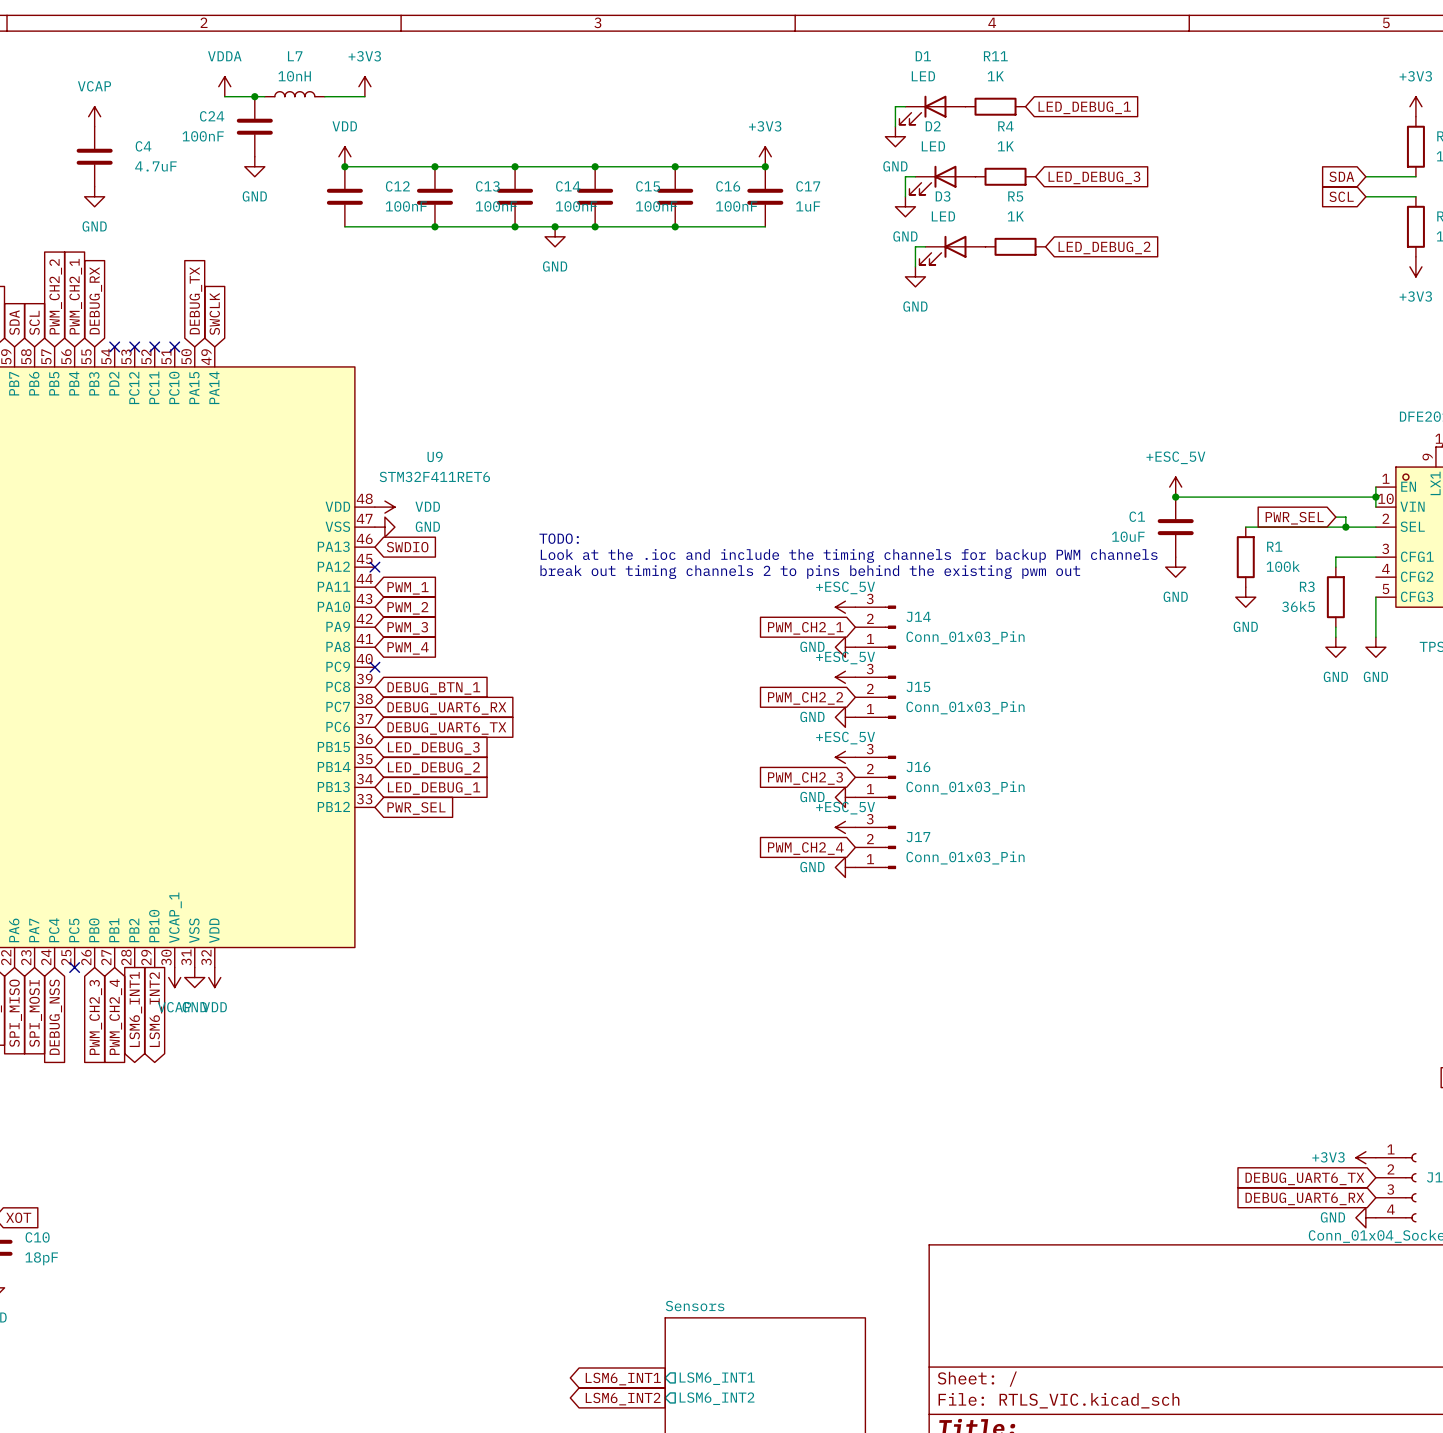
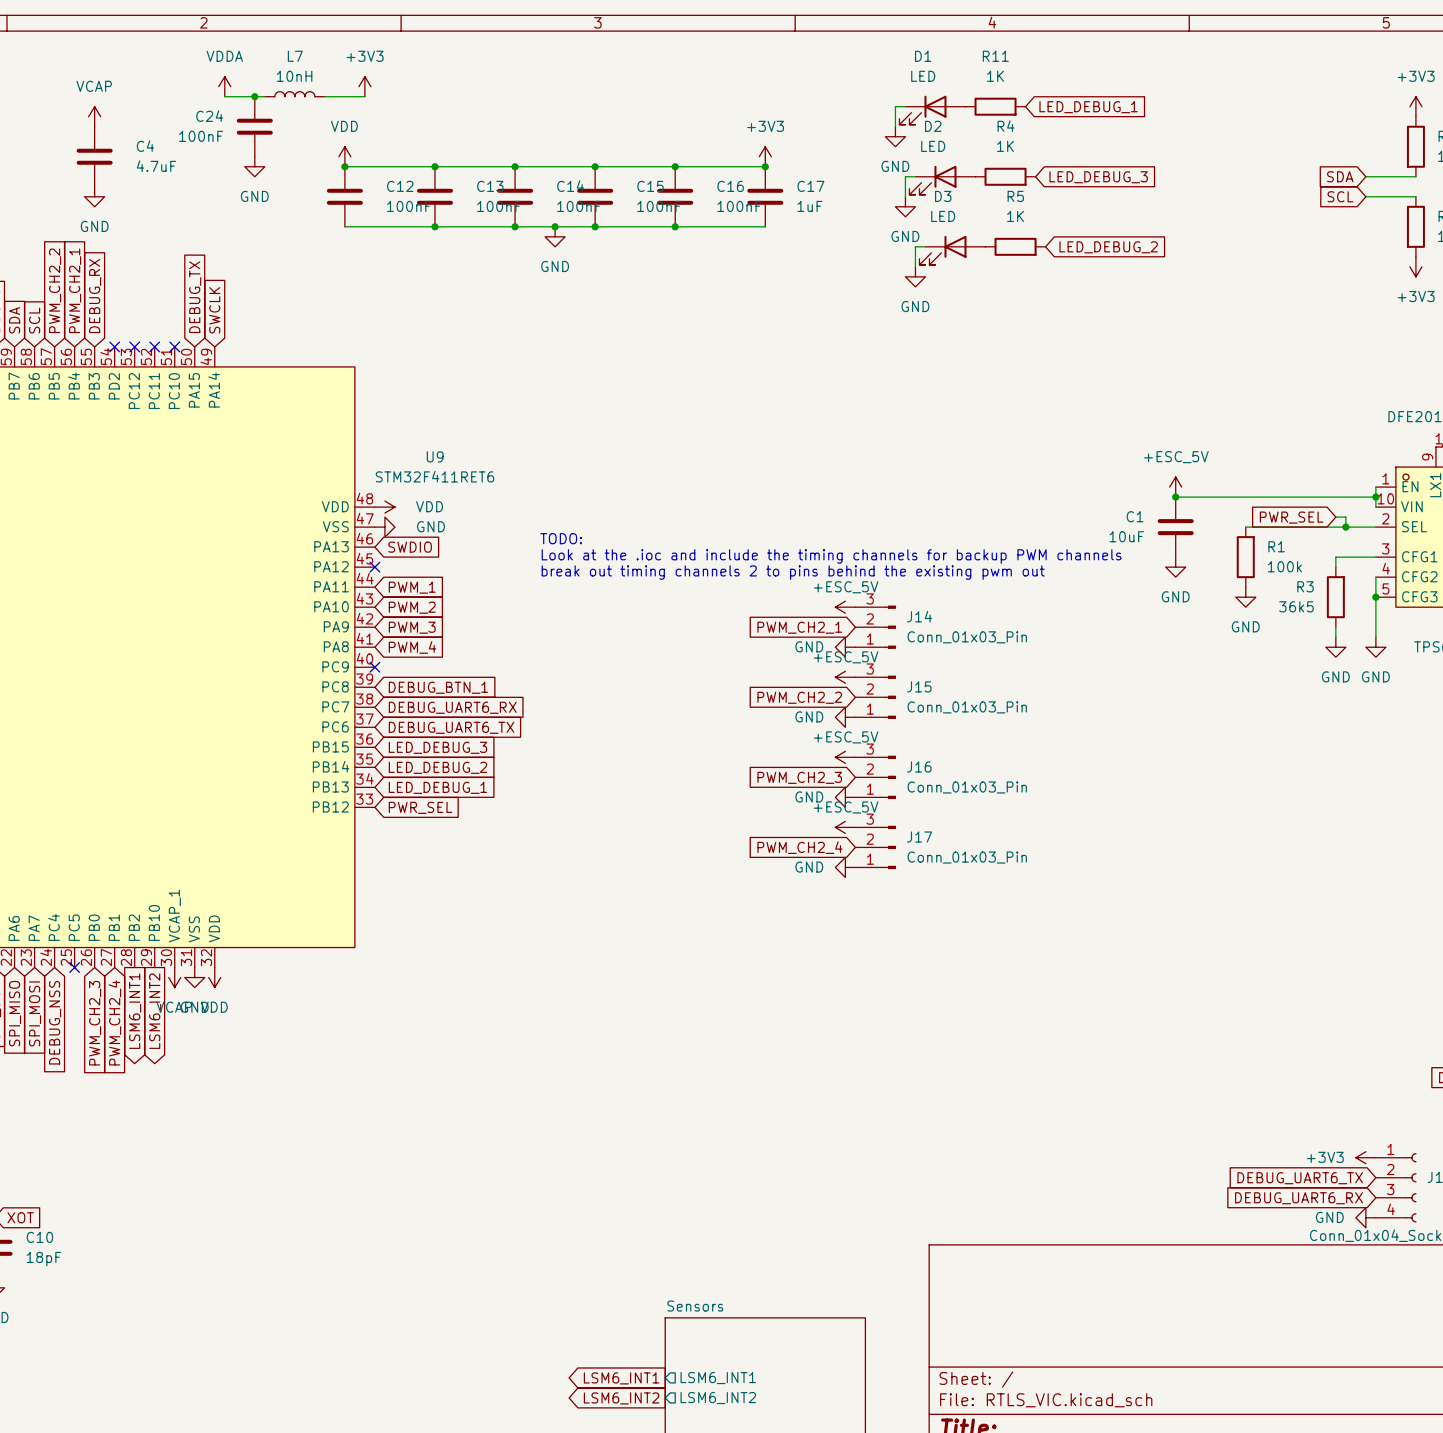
wire: none -> (1375, 577) (1375, 597)
junction: none -> (1375, 597)

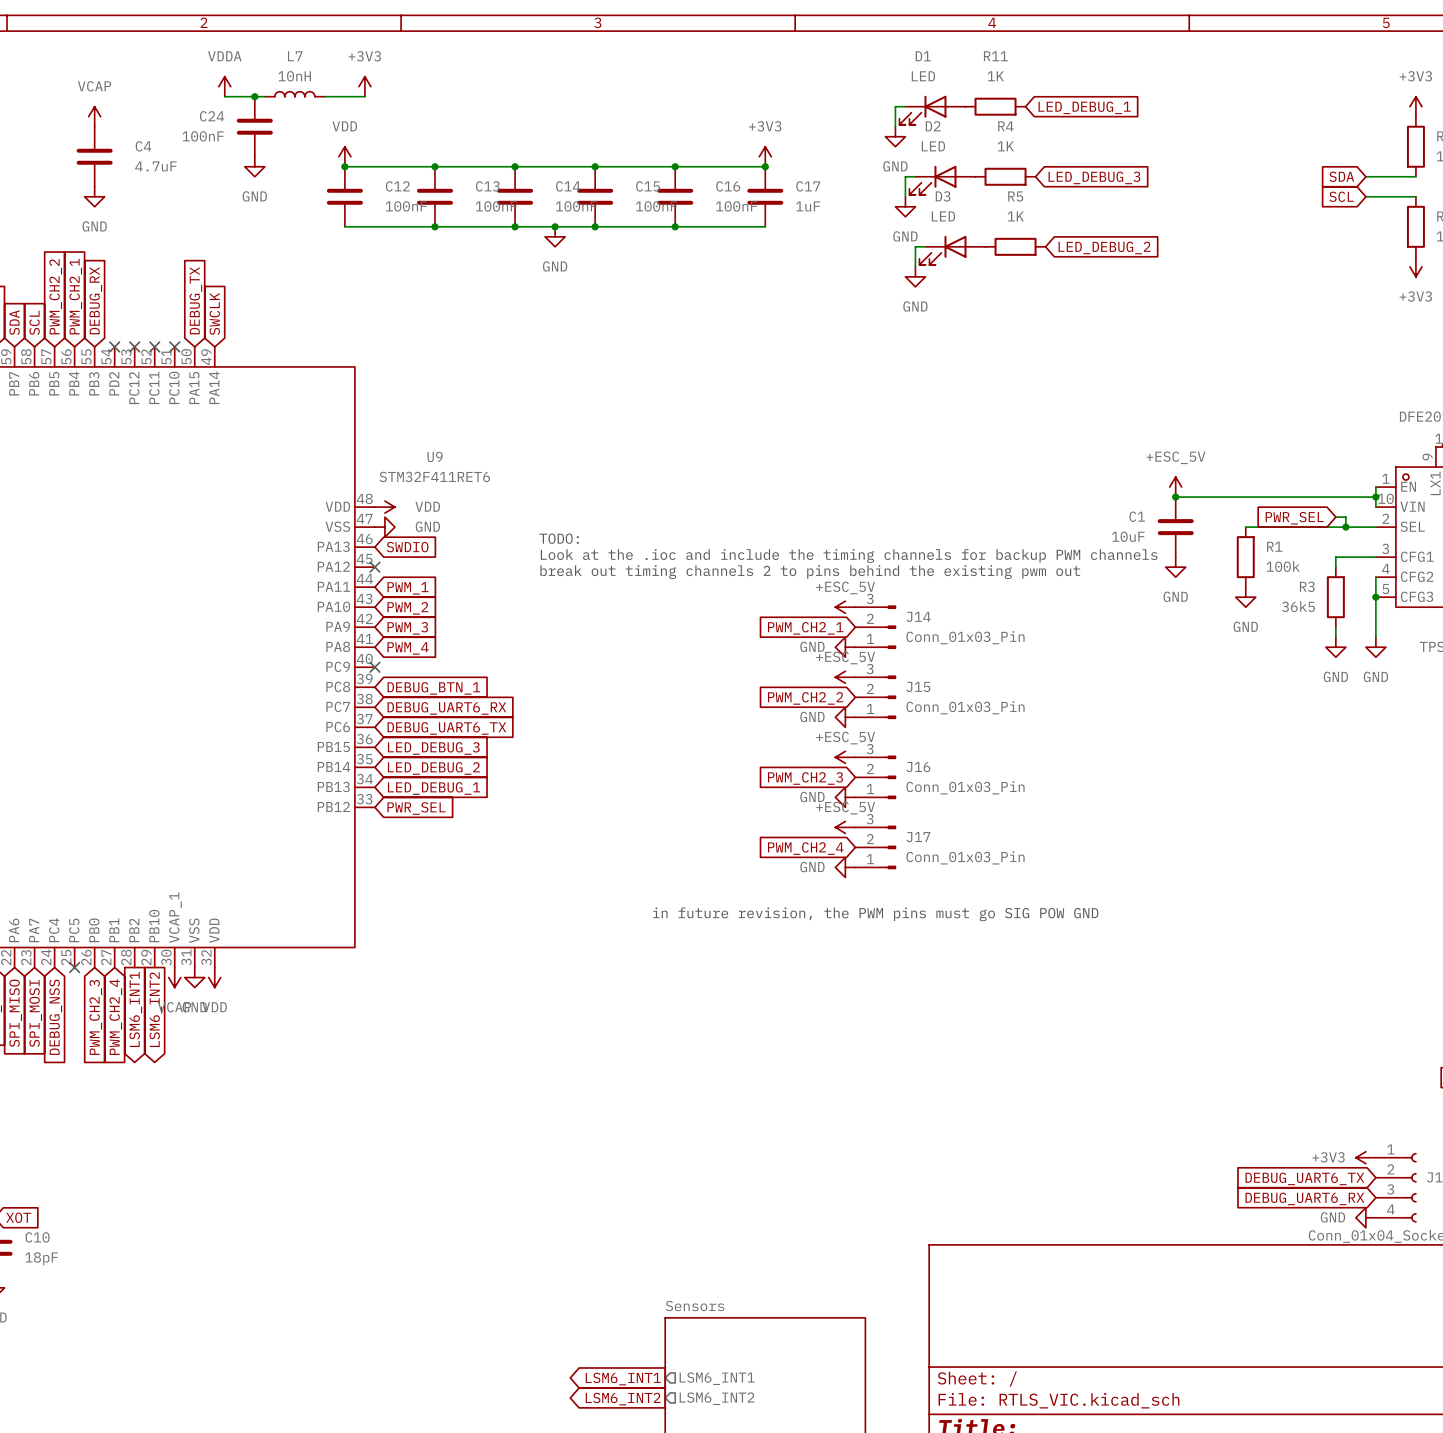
text: none -> in future revision, the PWM pins must go SIG POW GND (875, 914)

